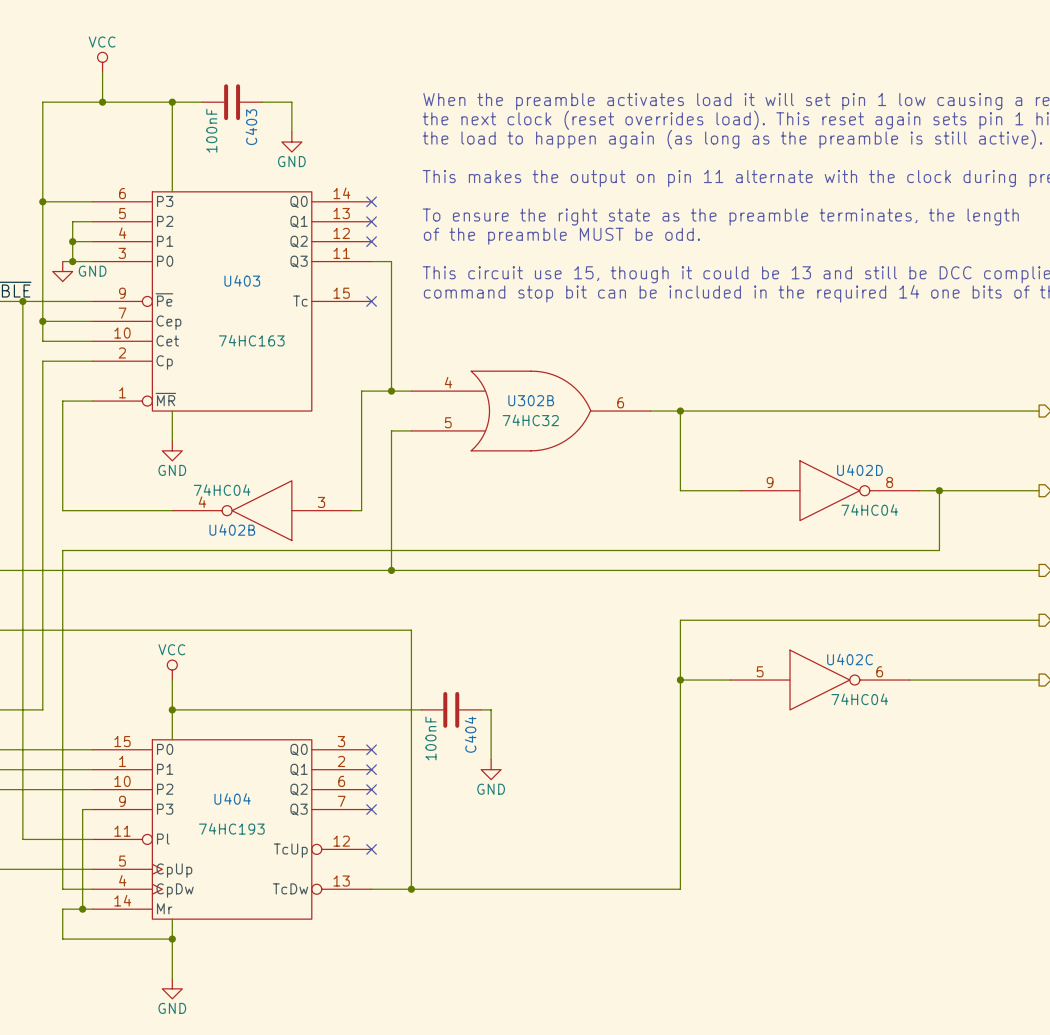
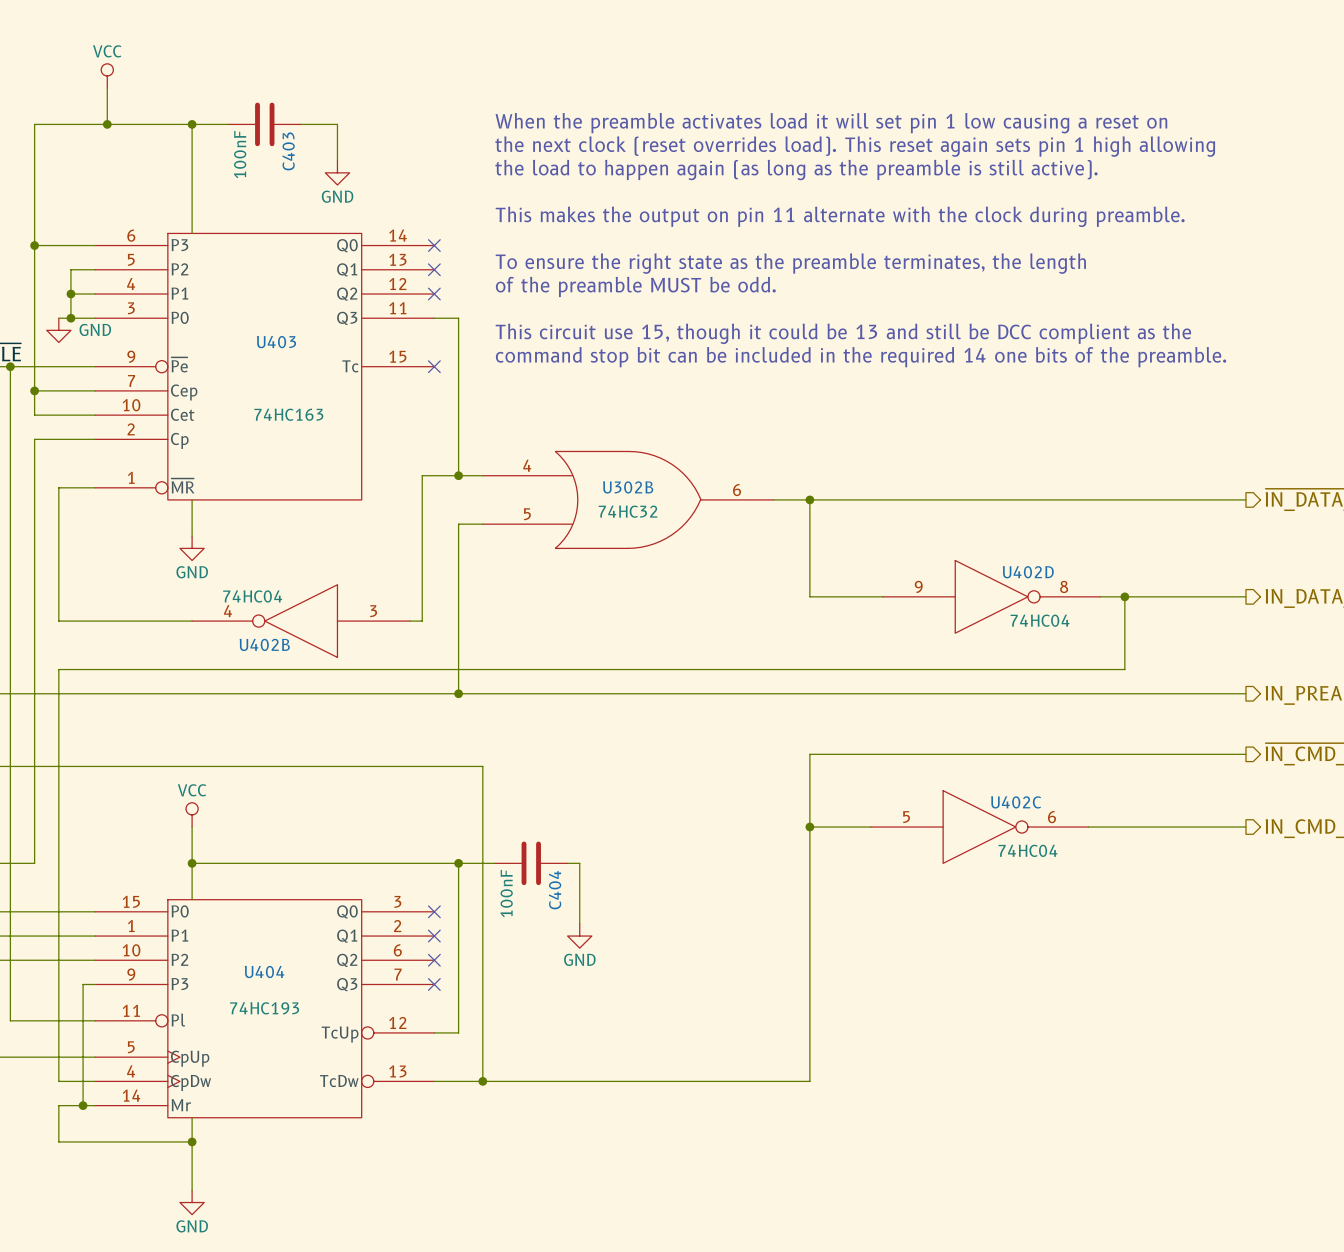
wire: none -> (458, 863) (458, 1032) (434, 1032)
junction: none -> (458, 863)
no-connect mark: (371, 849) -> none

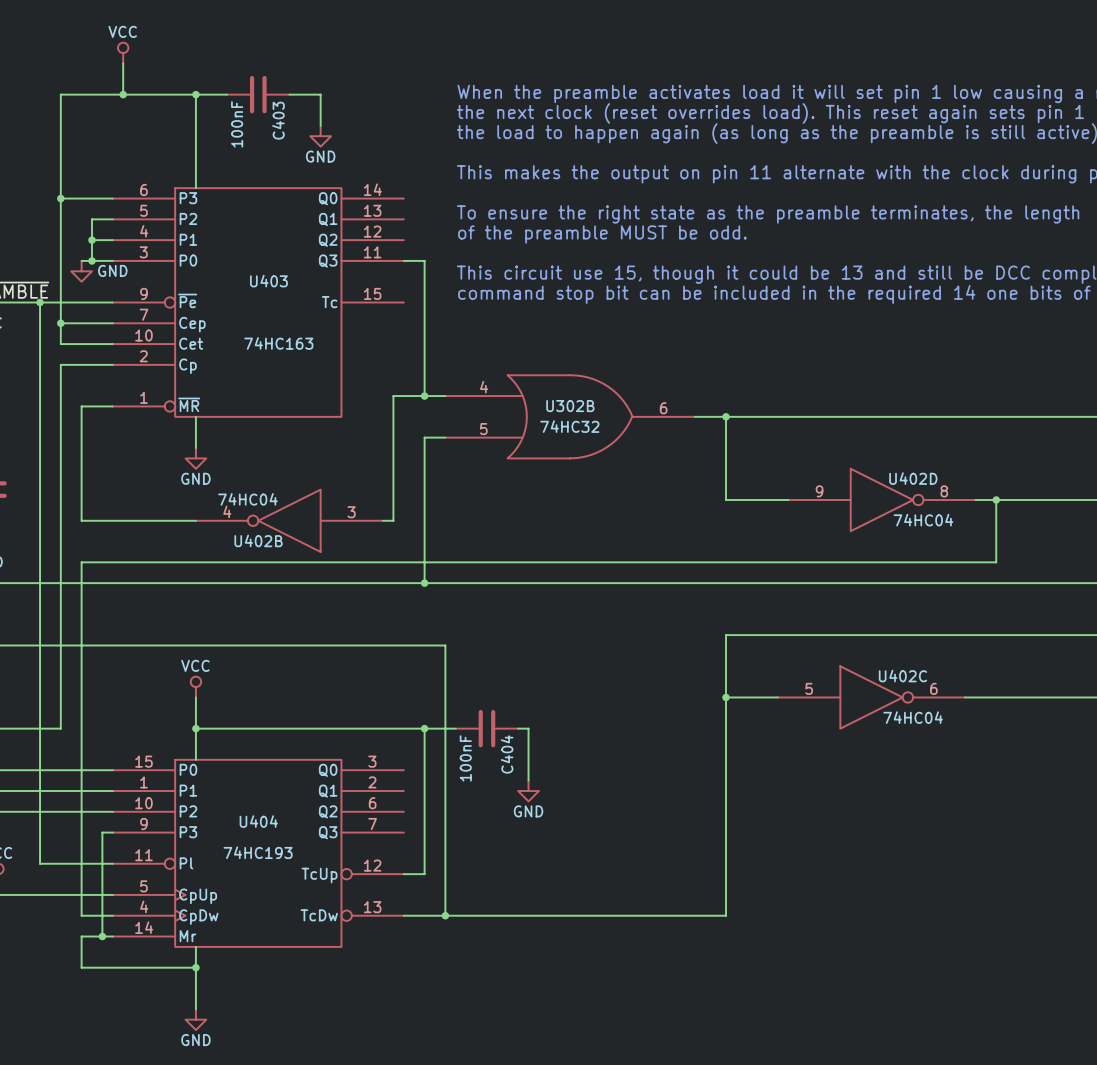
no-connect mark: (434, 245) -> none
no-connect mark: (434, 269) -> none
no-connect mark: (434, 294) -> none
no-connect mark: (434, 366) -> none
no-connect mark: (434, 911) -> none
no-connect mark: (434, 936) -> none
no-connect mark: (434, 960) -> none
no-connect mark: (434, 984) -> none

